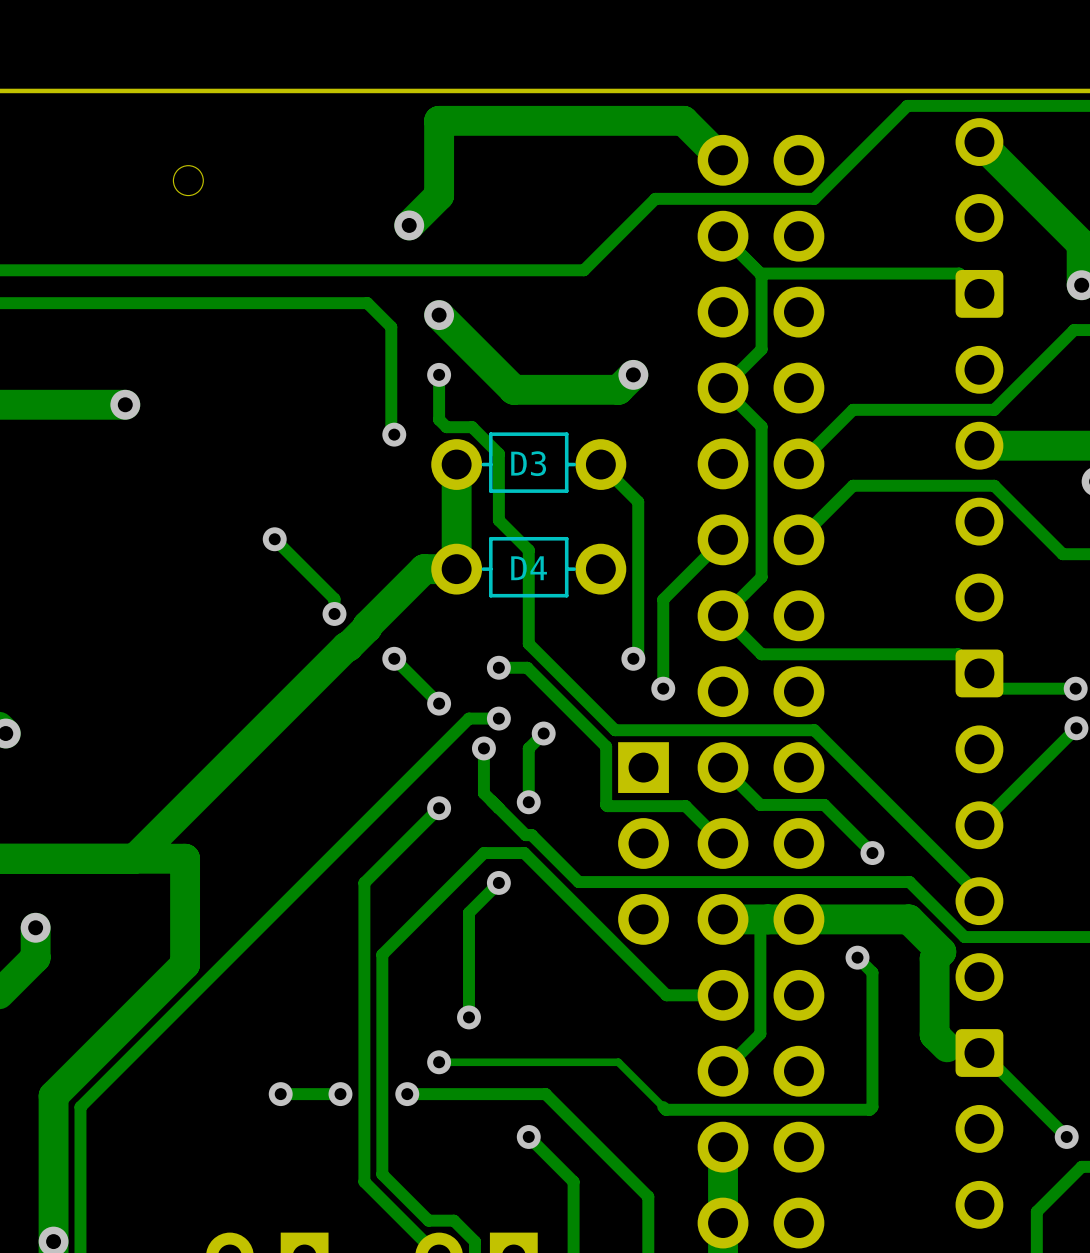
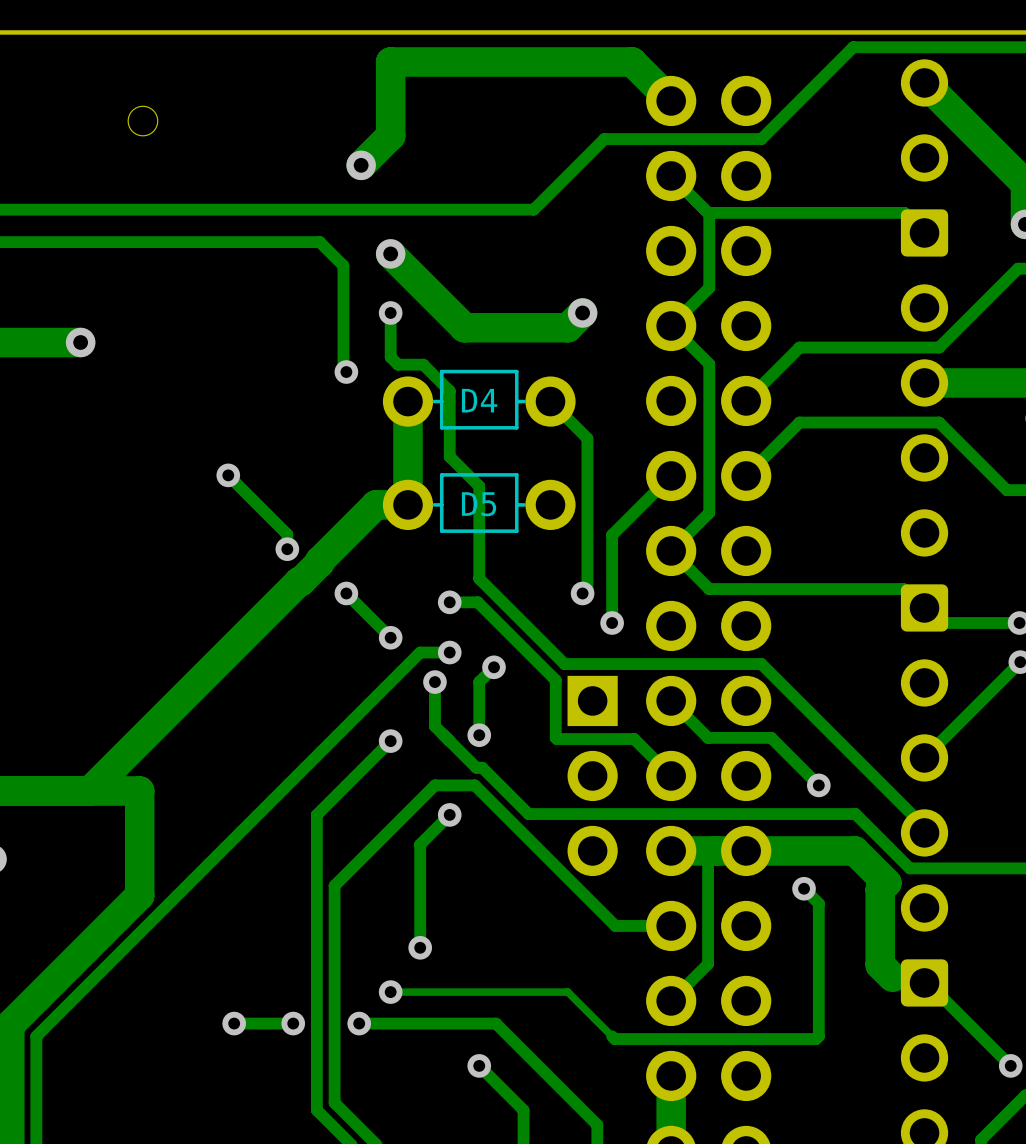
D3 name: D3 (528, 463) -> D4 (479, 400)
D4 name: D4 (529, 568) -> D5 (479, 504)

